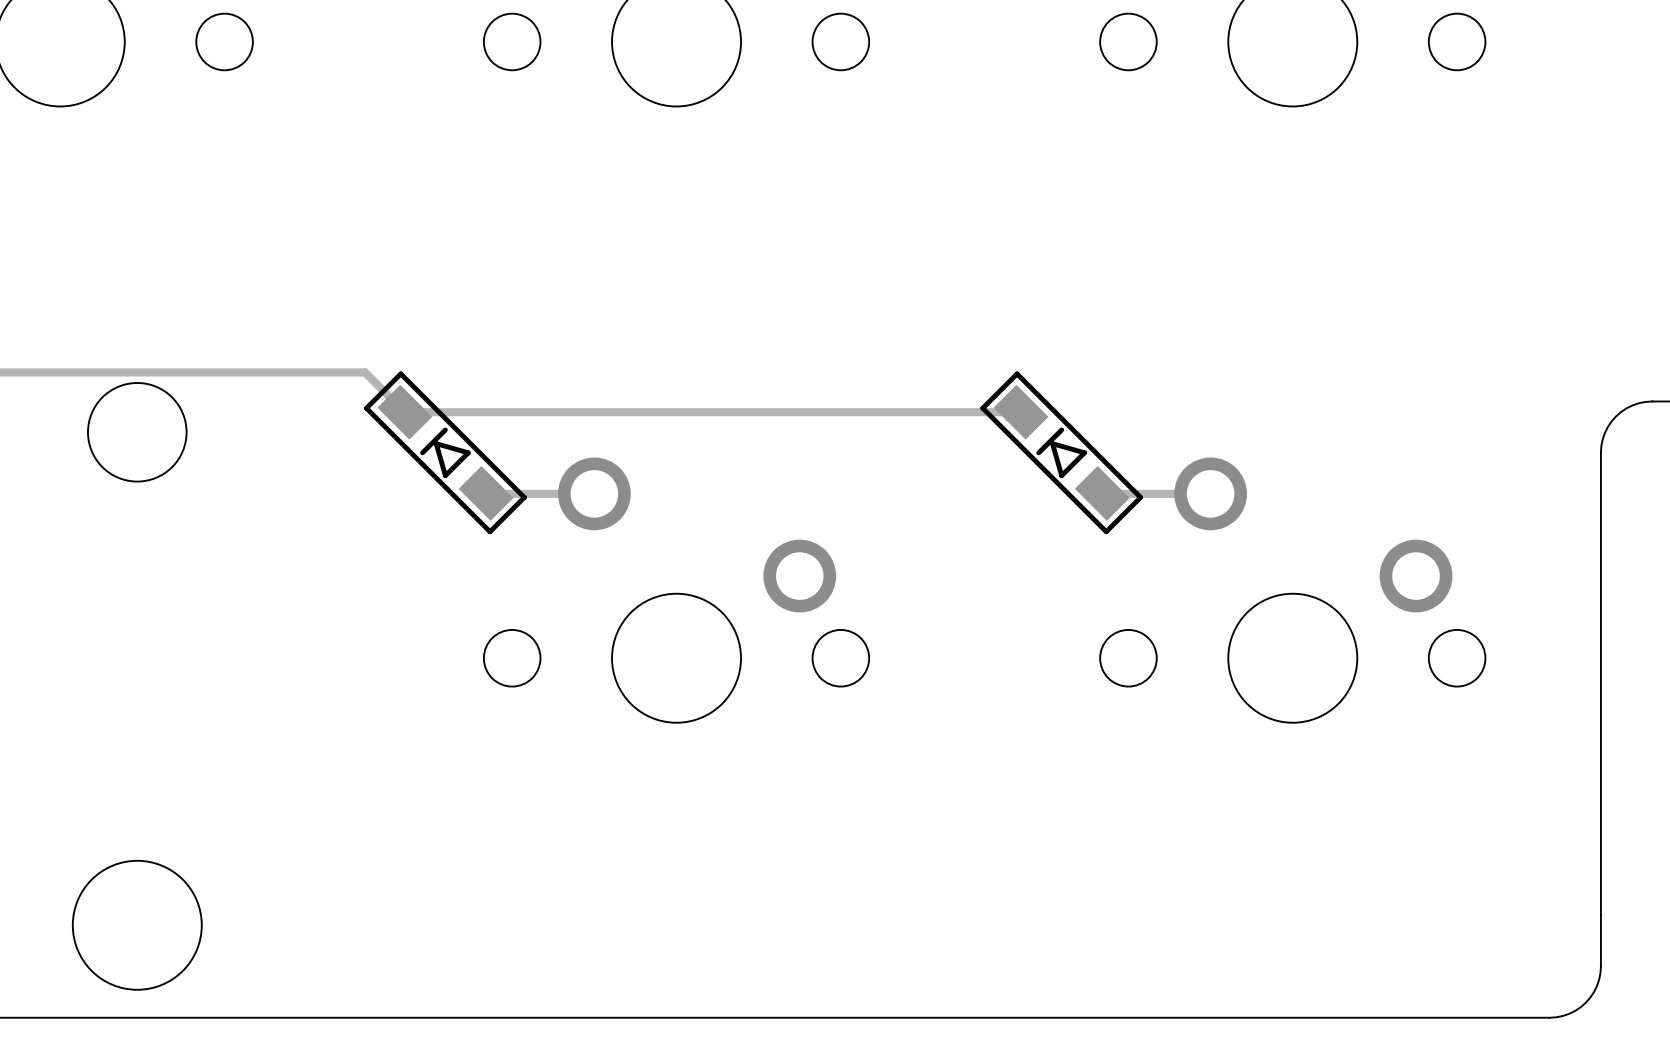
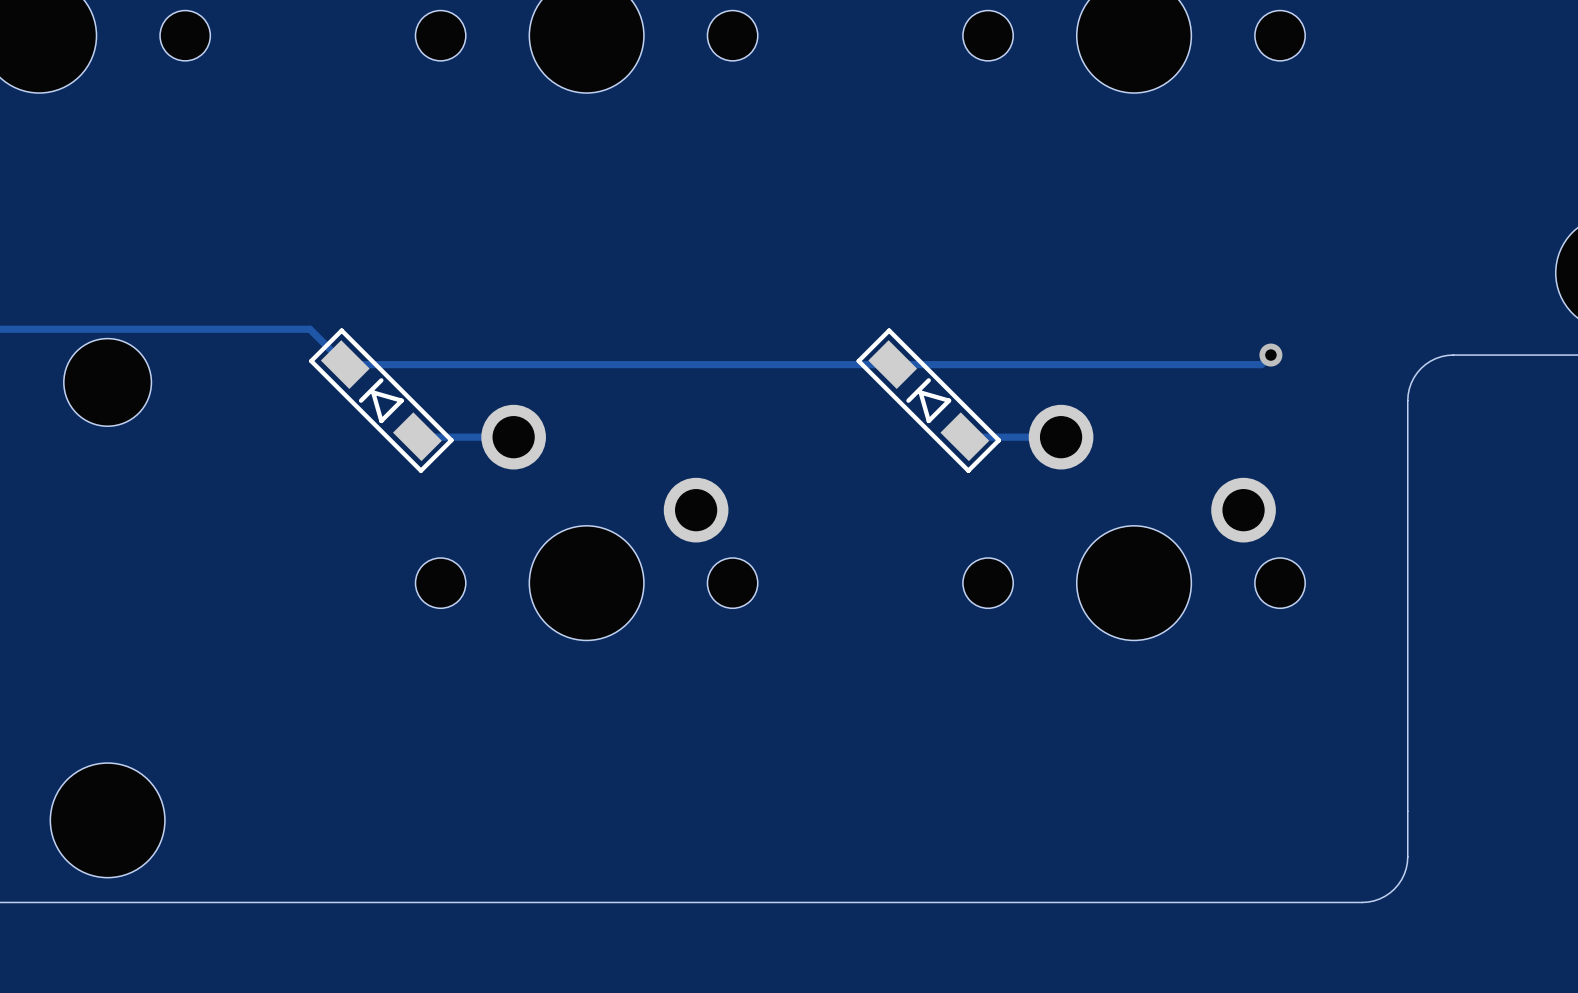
track: none -> (1270, 355) (1261, 364) (892, 364)
via: none -> (1270, 355)

